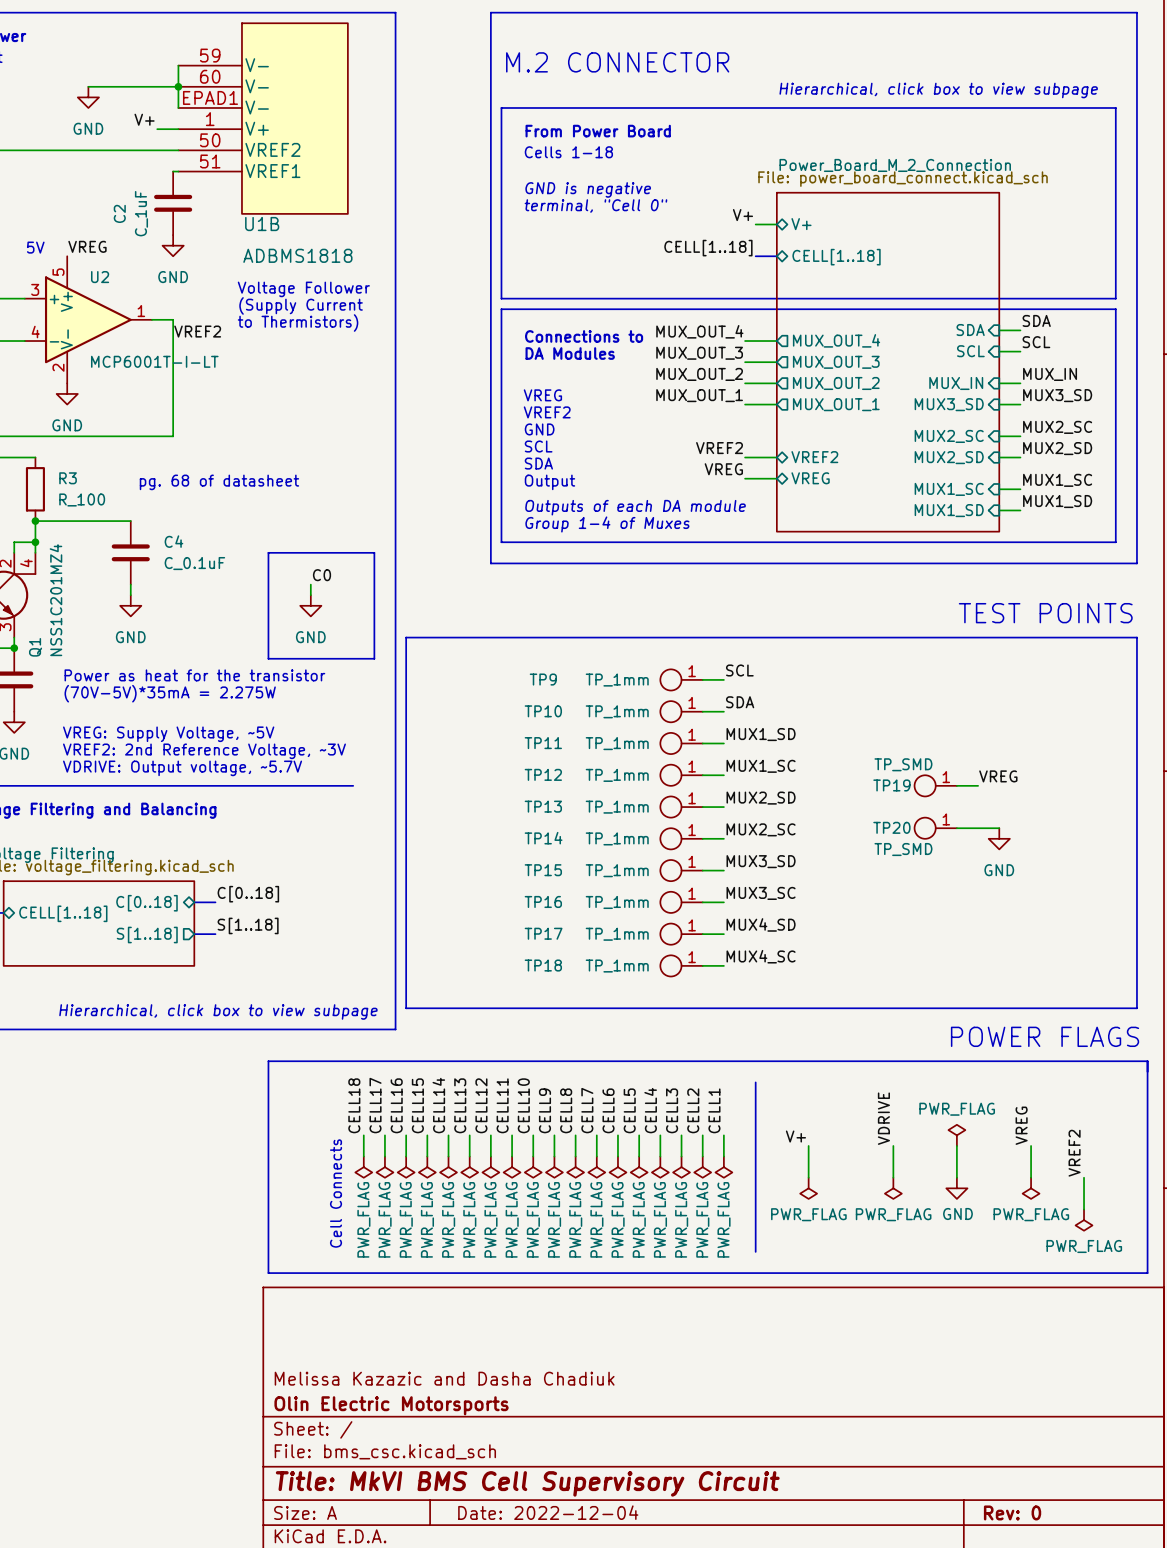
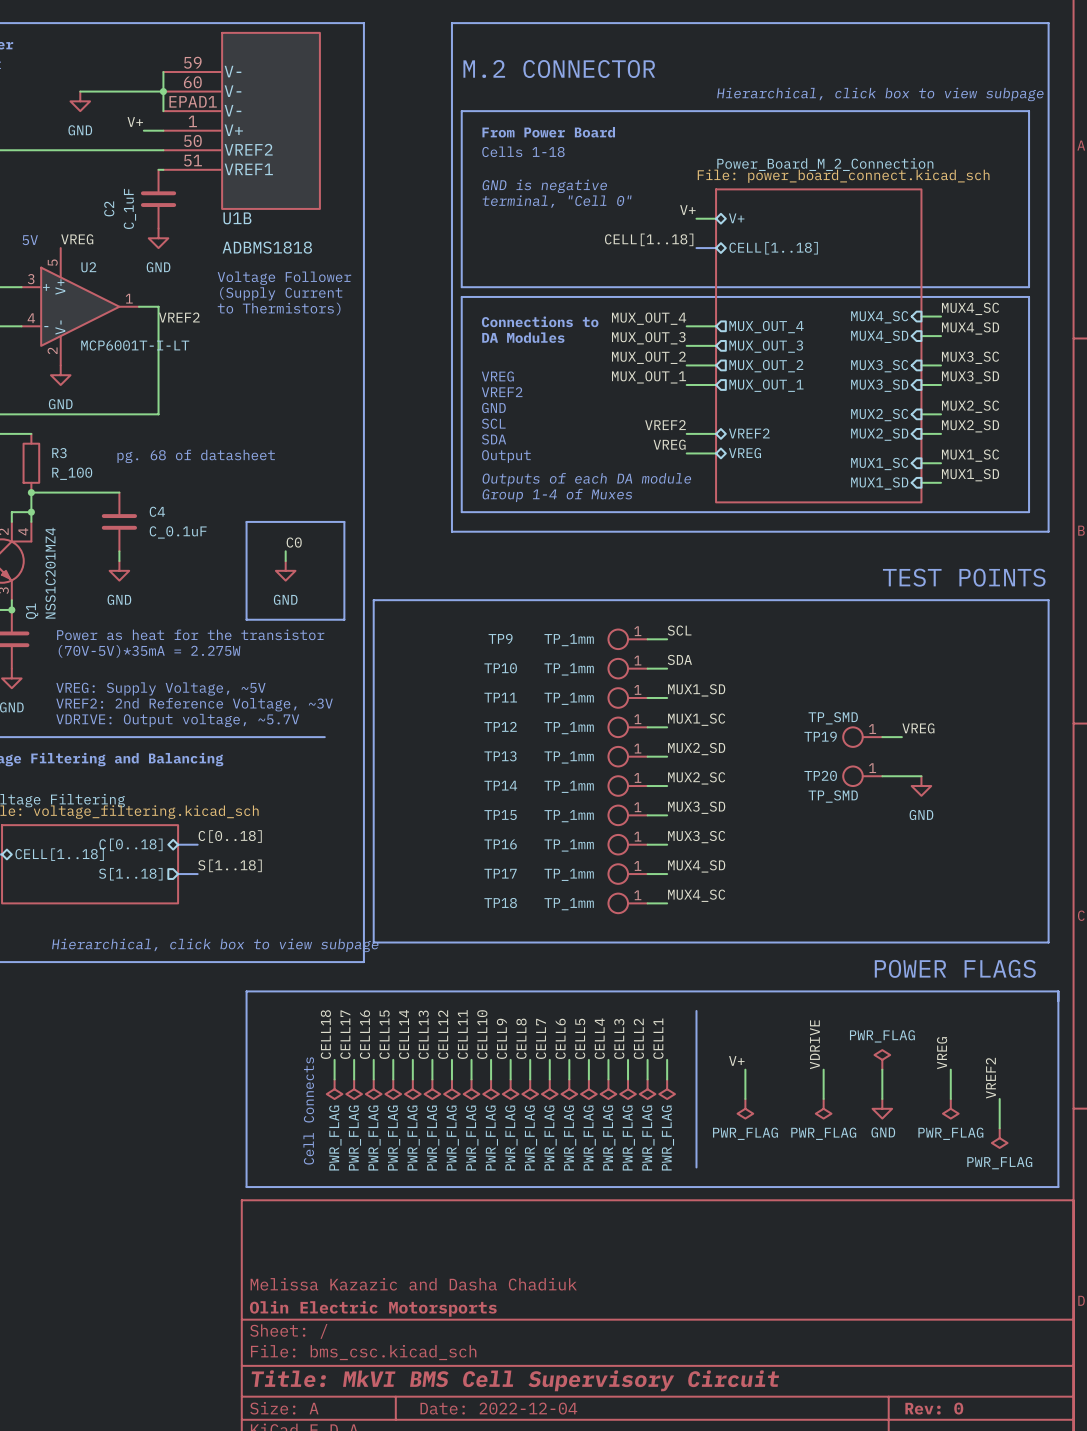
label: SDA (1036, 320) -> MUX4_SC (970, 308)
sheet pin: SDA (970, 330) -> MUX4_SC (879, 317)
label: SCL (1036, 342) -> MUX4_SD (970, 328)
sheet pin: SCL (970, 351) -> MUX4_SD (879, 336)
label: MUX_IN (1050, 374) -> MUX3_SC (970, 357)
sheet pin: MUX_IN (956, 383) -> MUX3_SC (879, 366)

